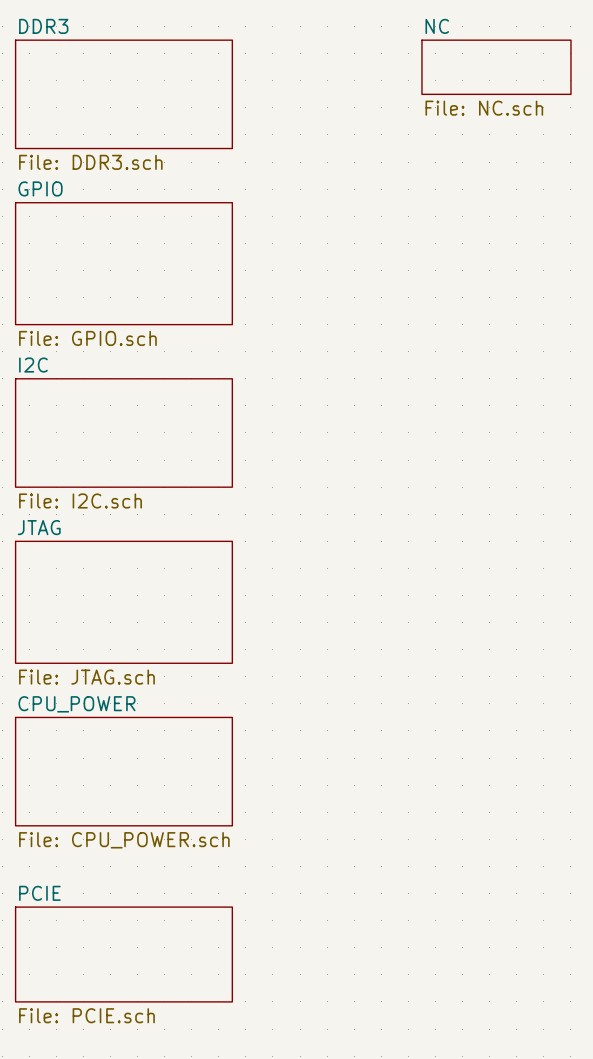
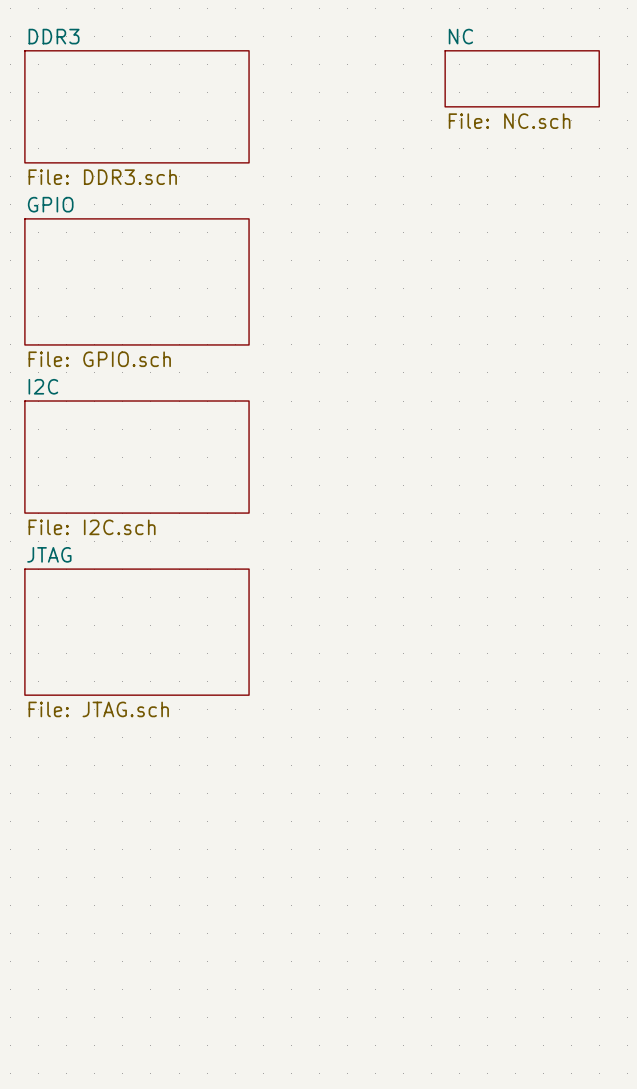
sheet CPU_POWER: File: CPU_POWER.sch (123, 771) -> none
sheet PCIE: File: PCIE.sch (123, 954) -> none

